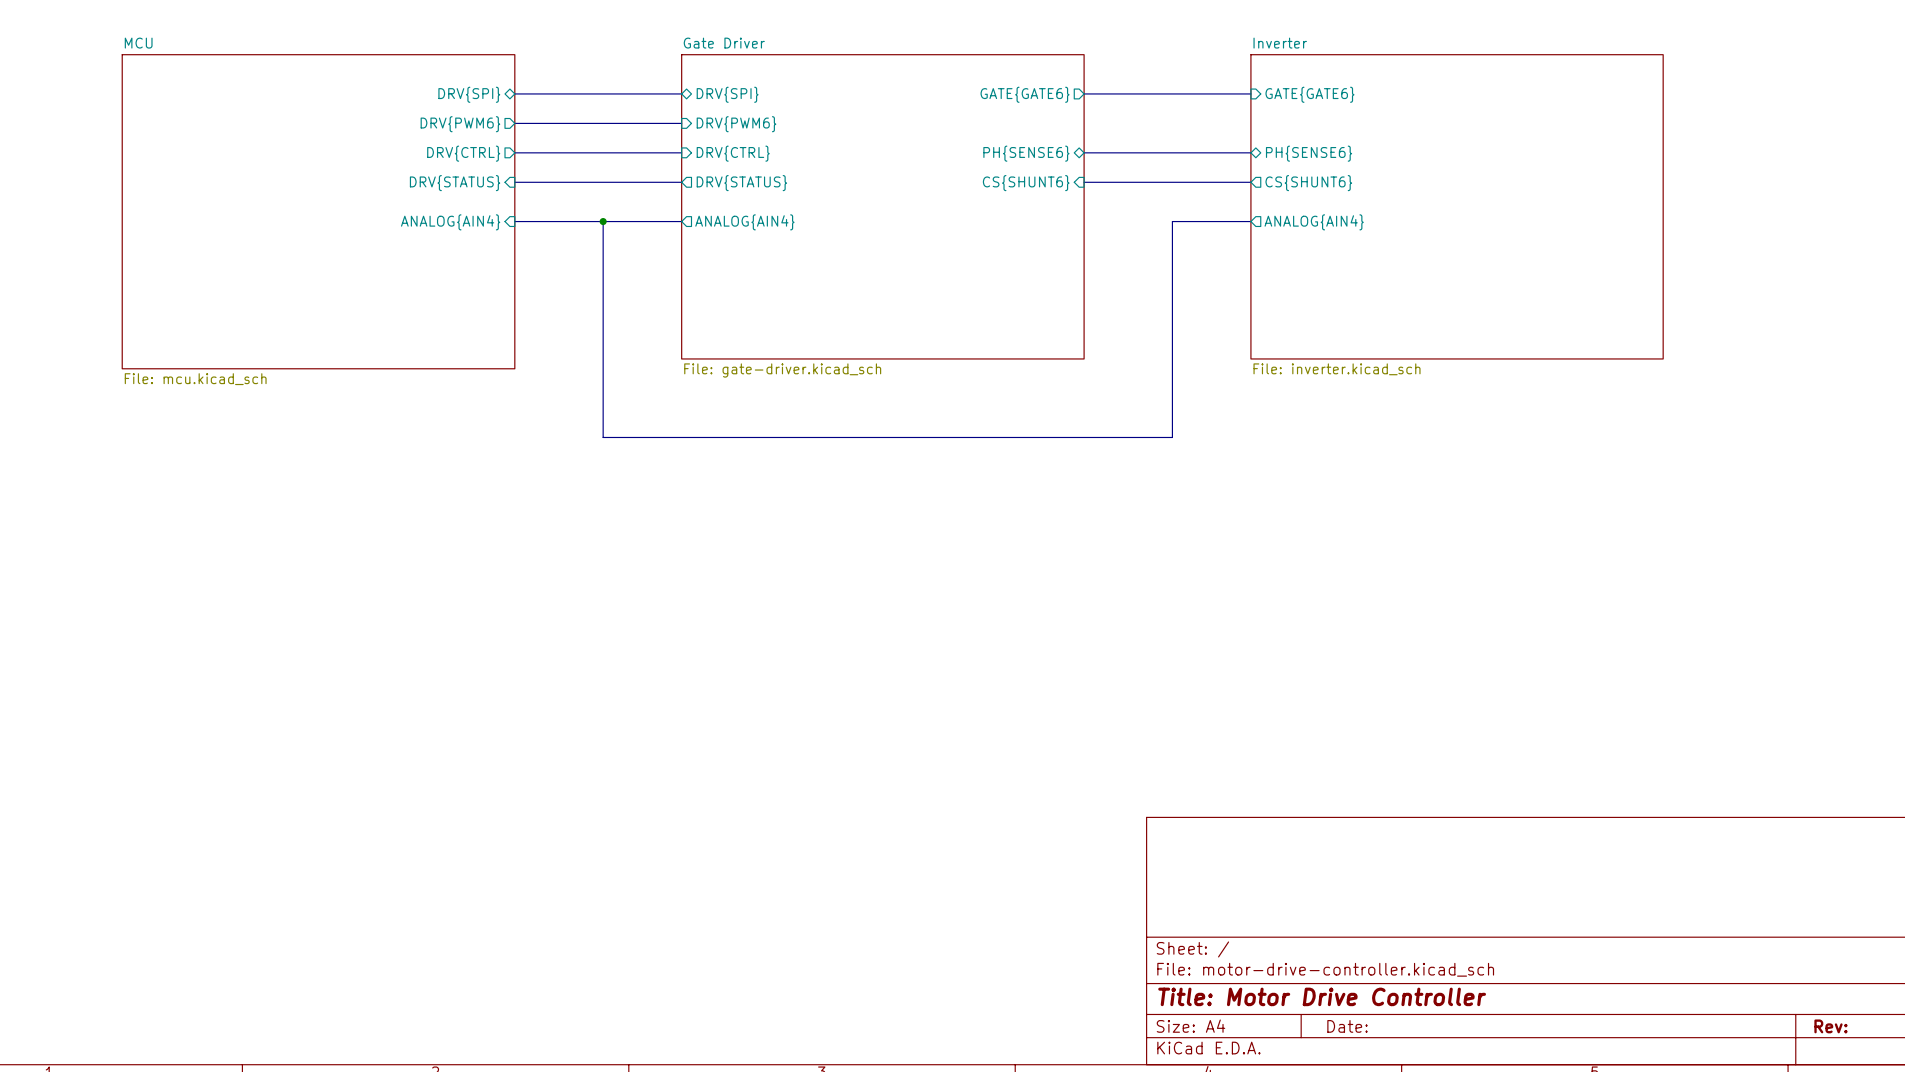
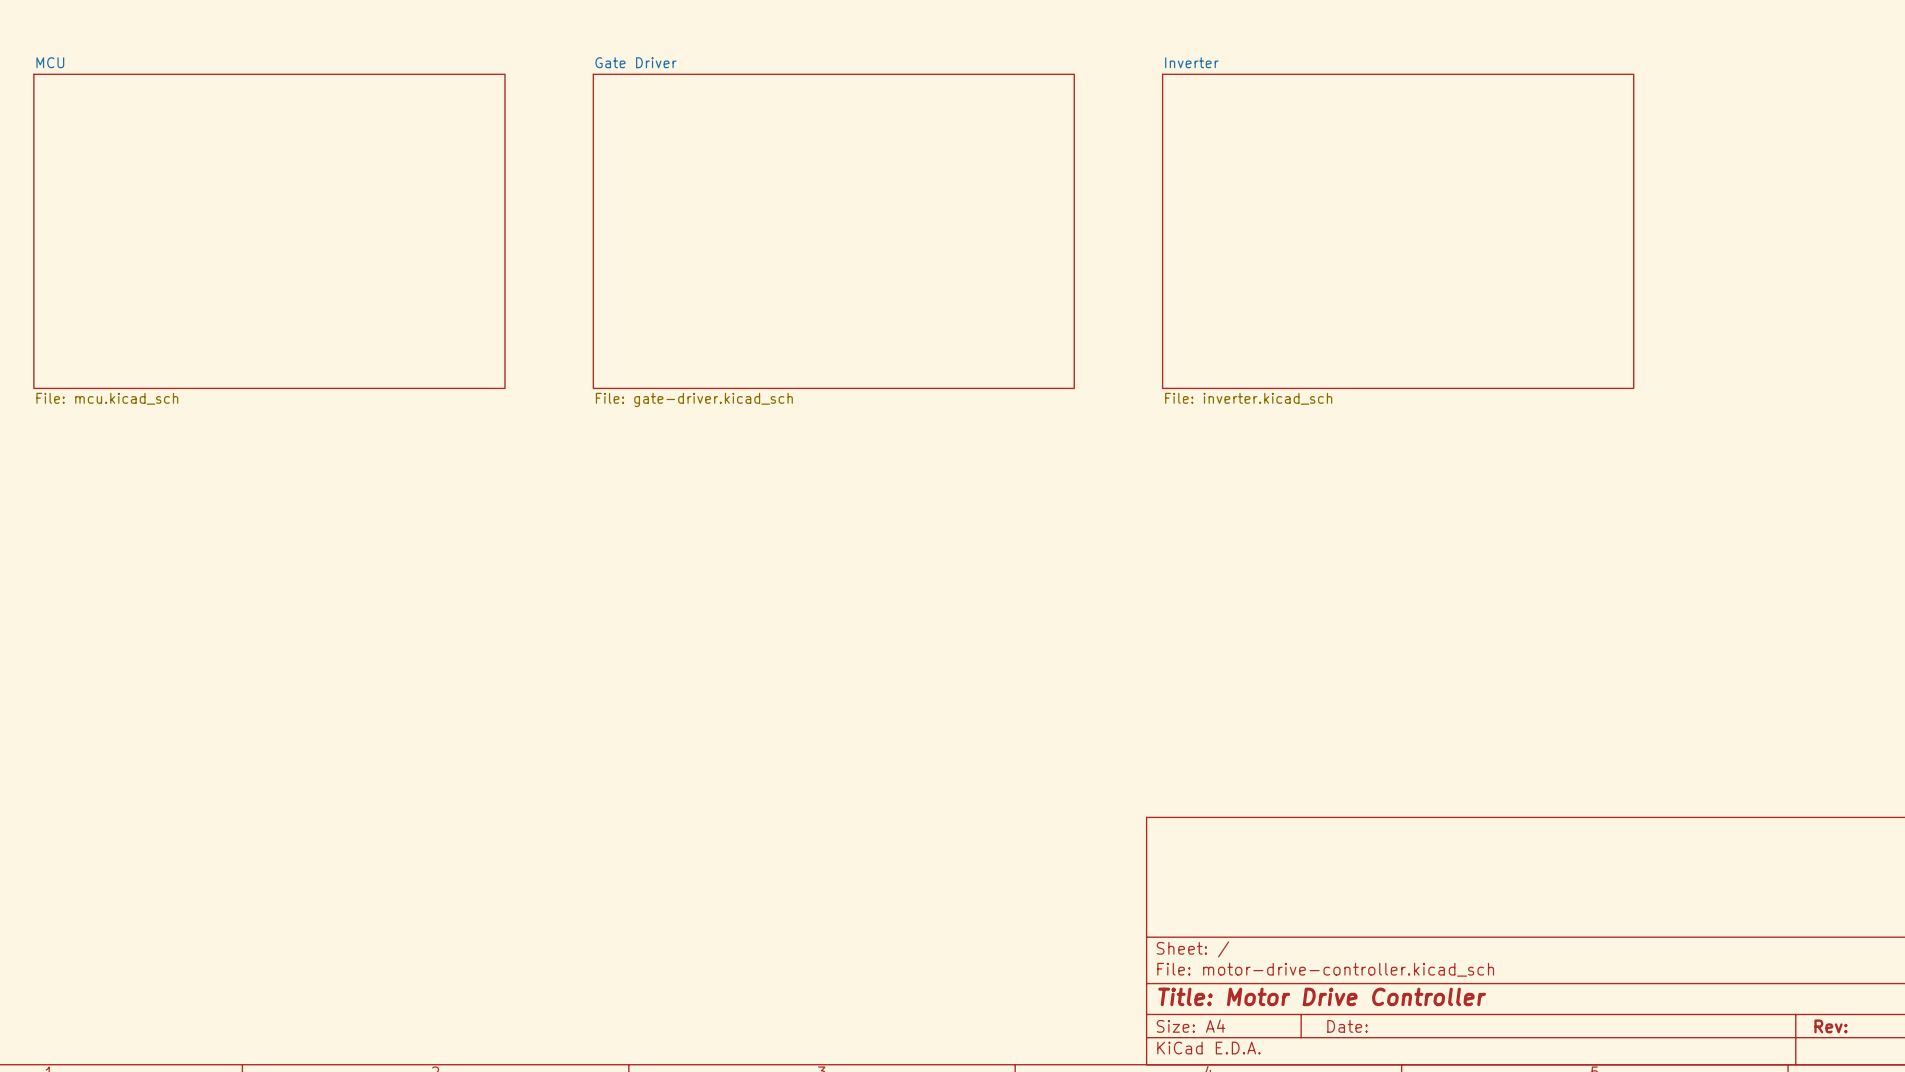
bus: (514, 93) (681, 93) -> none
bus: (1084, 93) (1250, 93) -> none
sheet pin: DRV{SPI} (469, 94) -> none
sheet pin: DRV{SPI} (727, 94) -> none
sheet pin: GATE{GATE6} (1025, 94) -> none
sheet pin: GATE{GATE6} (1309, 94) -> none
bus: (514, 123) (681, 123) -> none
sheet pin: DRV{PWM6} (460, 124) -> none
sheet pin: DRV{PWM6} (736, 124) -> none
bus: (514, 152) (681, 152) -> none
bus: (1084, 152) (1250, 152) -> none
sheet pin: DRV{CTRL} (463, 153) -> none
sheet pin: DRV{CTRL} (733, 153) -> none
sheet pin: PH{SENSE6} (1026, 153) -> none
sheet pin: PH{SENSE6} (1309, 153) -> none
bus: (514, 182) (681, 182) -> none
bus: (1084, 182) (1250, 182) -> none
sheet pin: DRV{STATUS} (455, 183) -> none
sheet pin: DRV{STATUS} (741, 183) -> none
sheet pin: CS{SHUNT6} (1026, 183) -> none
sheet pin: CS{SHUNT6} (1308, 183) -> none
sheet Gate Driver: File: gate-driver.kicad_sch (882, 206) -> none
sheet Inverter: File: inverter.kicad_sch (1457, 206) -> none
sheet MCU: File: mcu.kicad_sch (318, 211) -> none
bus: (514, 221) (681, 221) -> none
bus: (603, 221) (603, 437) (1172, 437) (1172, 221) (1250, 221) -> none
junction: (603, 221) -> none
sheet pin: ANALOG{AIN4} (450, 222) -> none
sheet pin: ANALOG{AIN4} (744, 222) -> none
sheet pin: ANALOG{AIN4} (1314, 222) -> none
sheet MCU: none -> File: mcu.kicad_sch (269, 231)
sheet Gate Driver: none -> File: gate-driver.kicad_sch (833, 231)
sheet Inverter: none -> File: inverter.kicad_sch (1398, 231)

